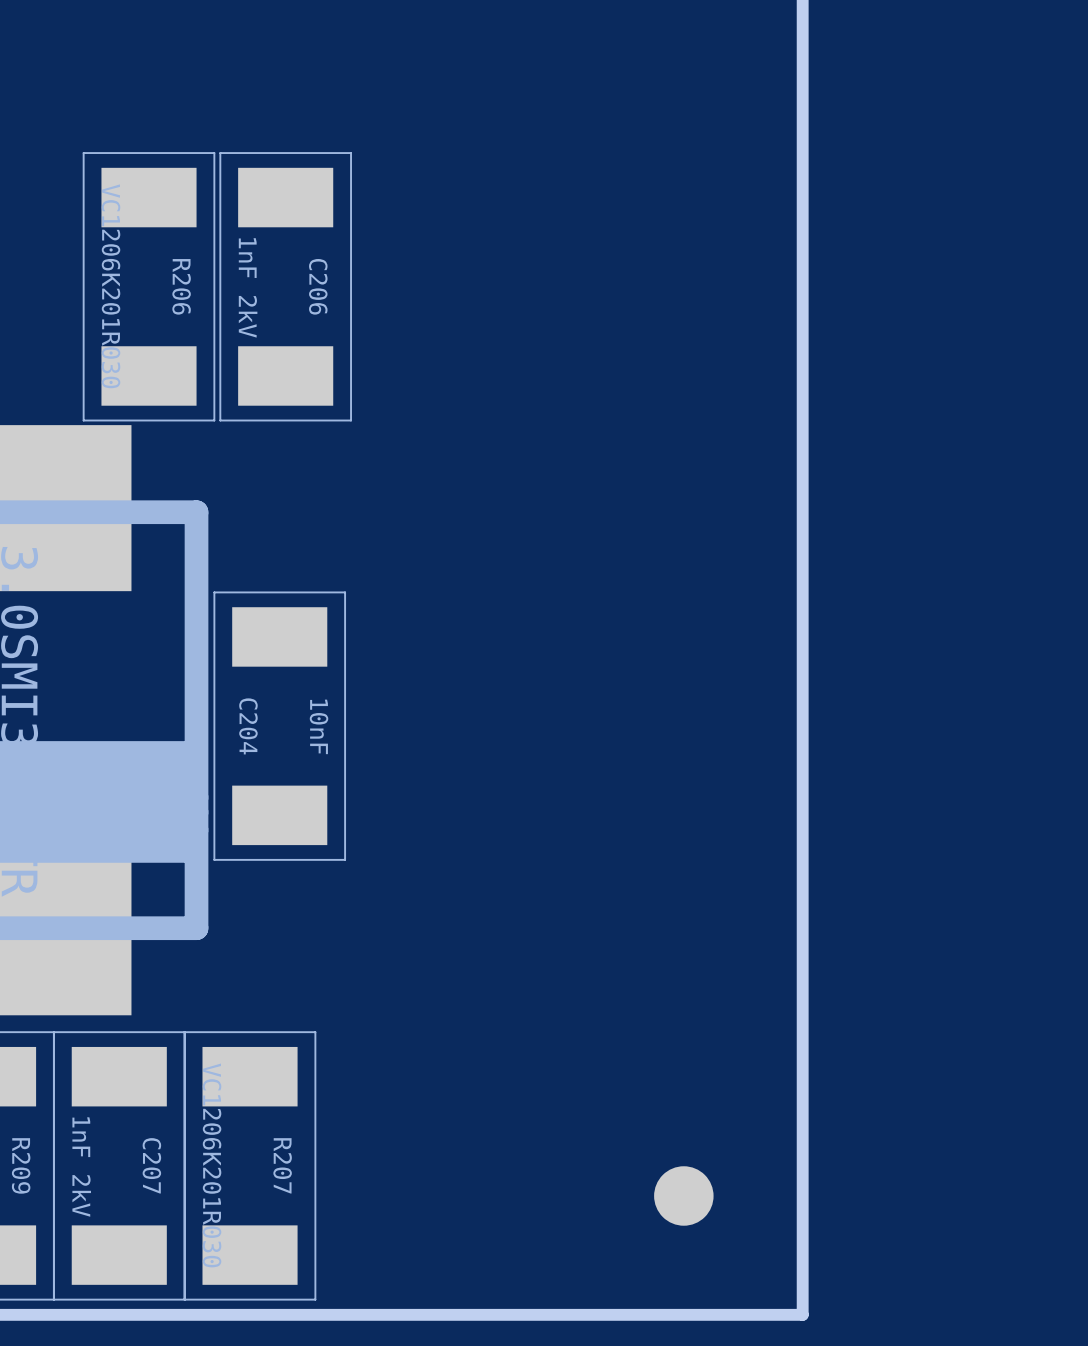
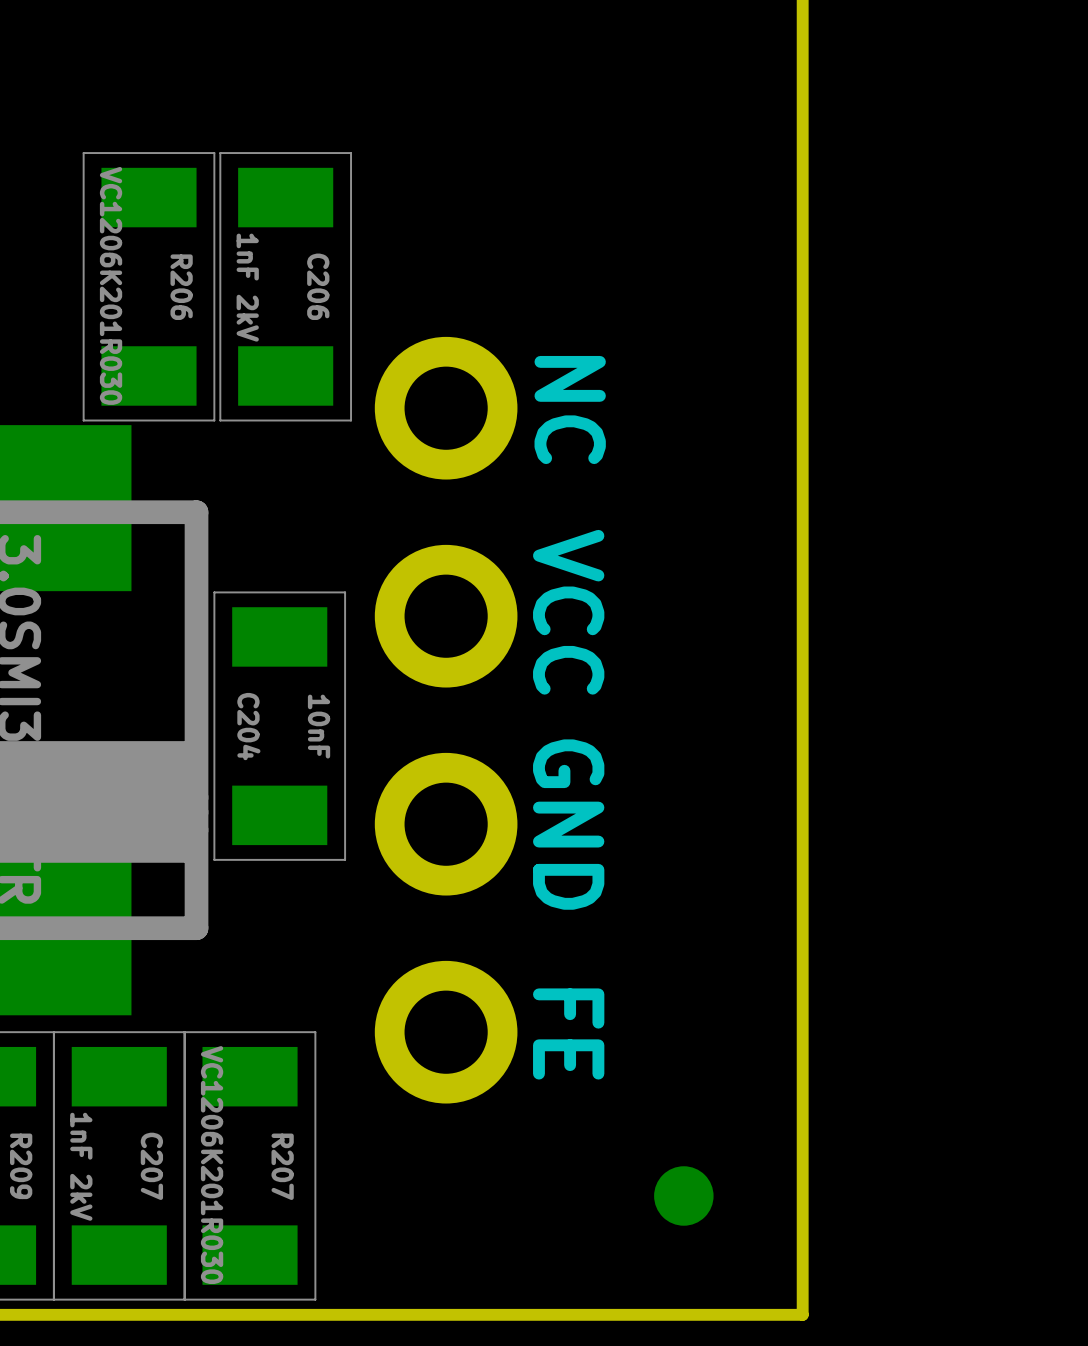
text: none -> NC (570, 410)
text: none -> VCC (568, 612)
part: none -> (446, 720)
text: none -> GND (568, 824)
text: none -> FE (568, 1033)

